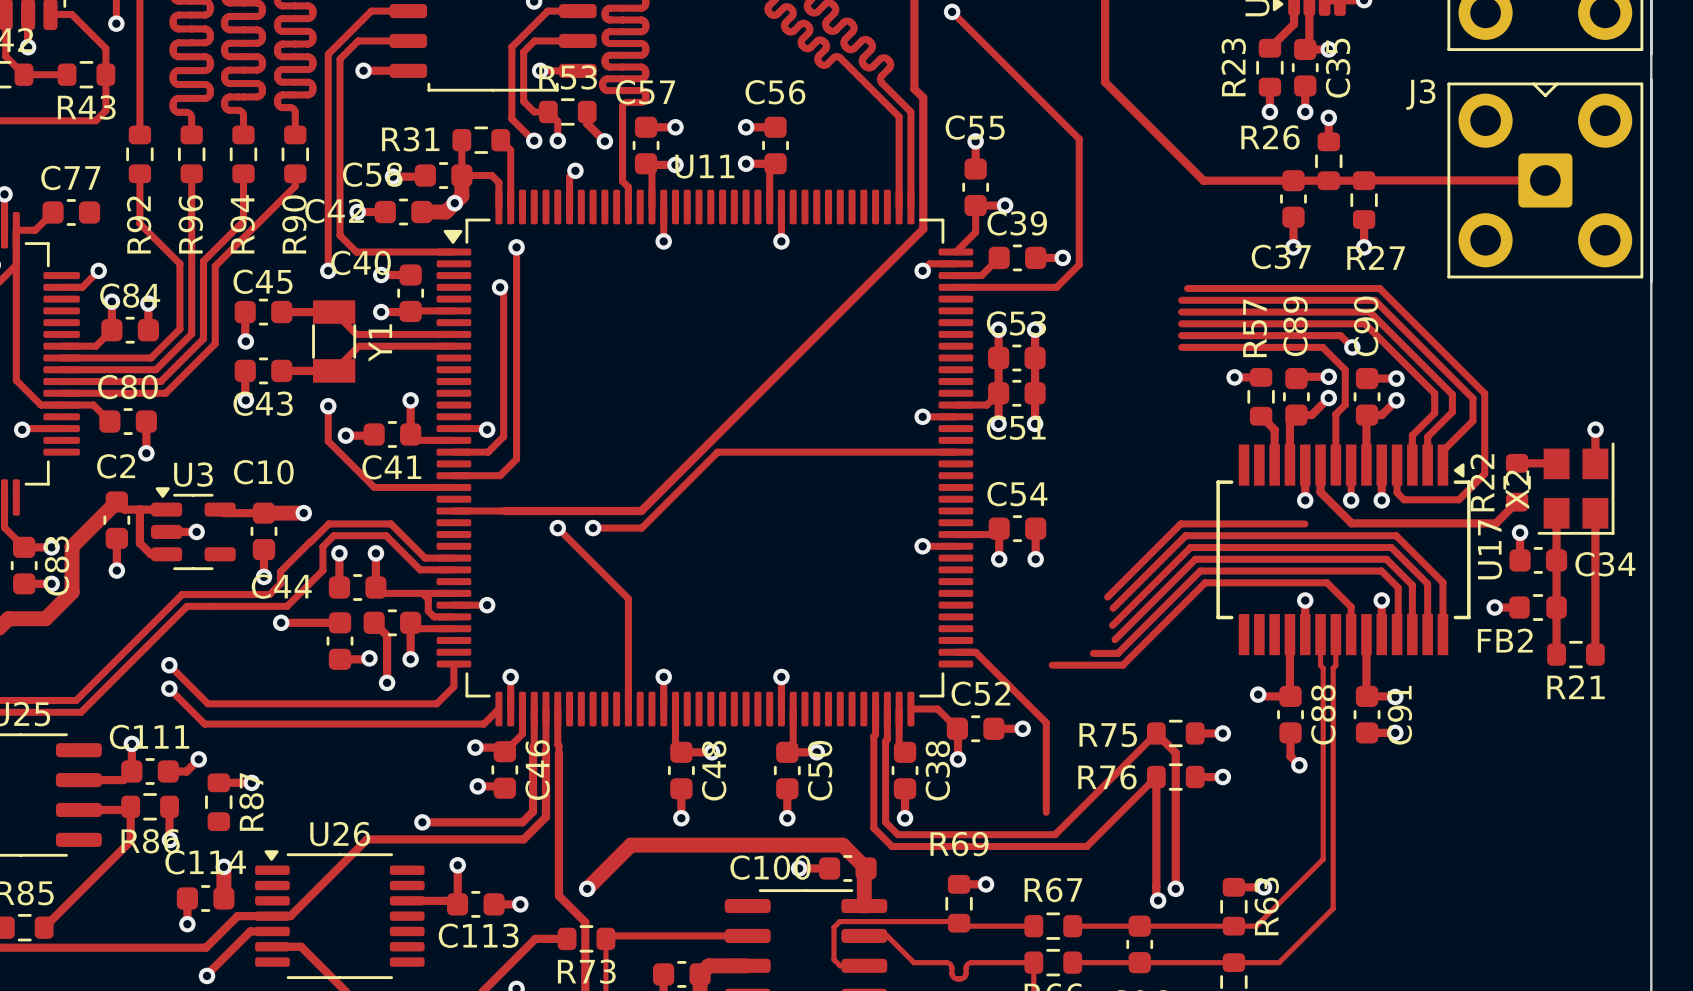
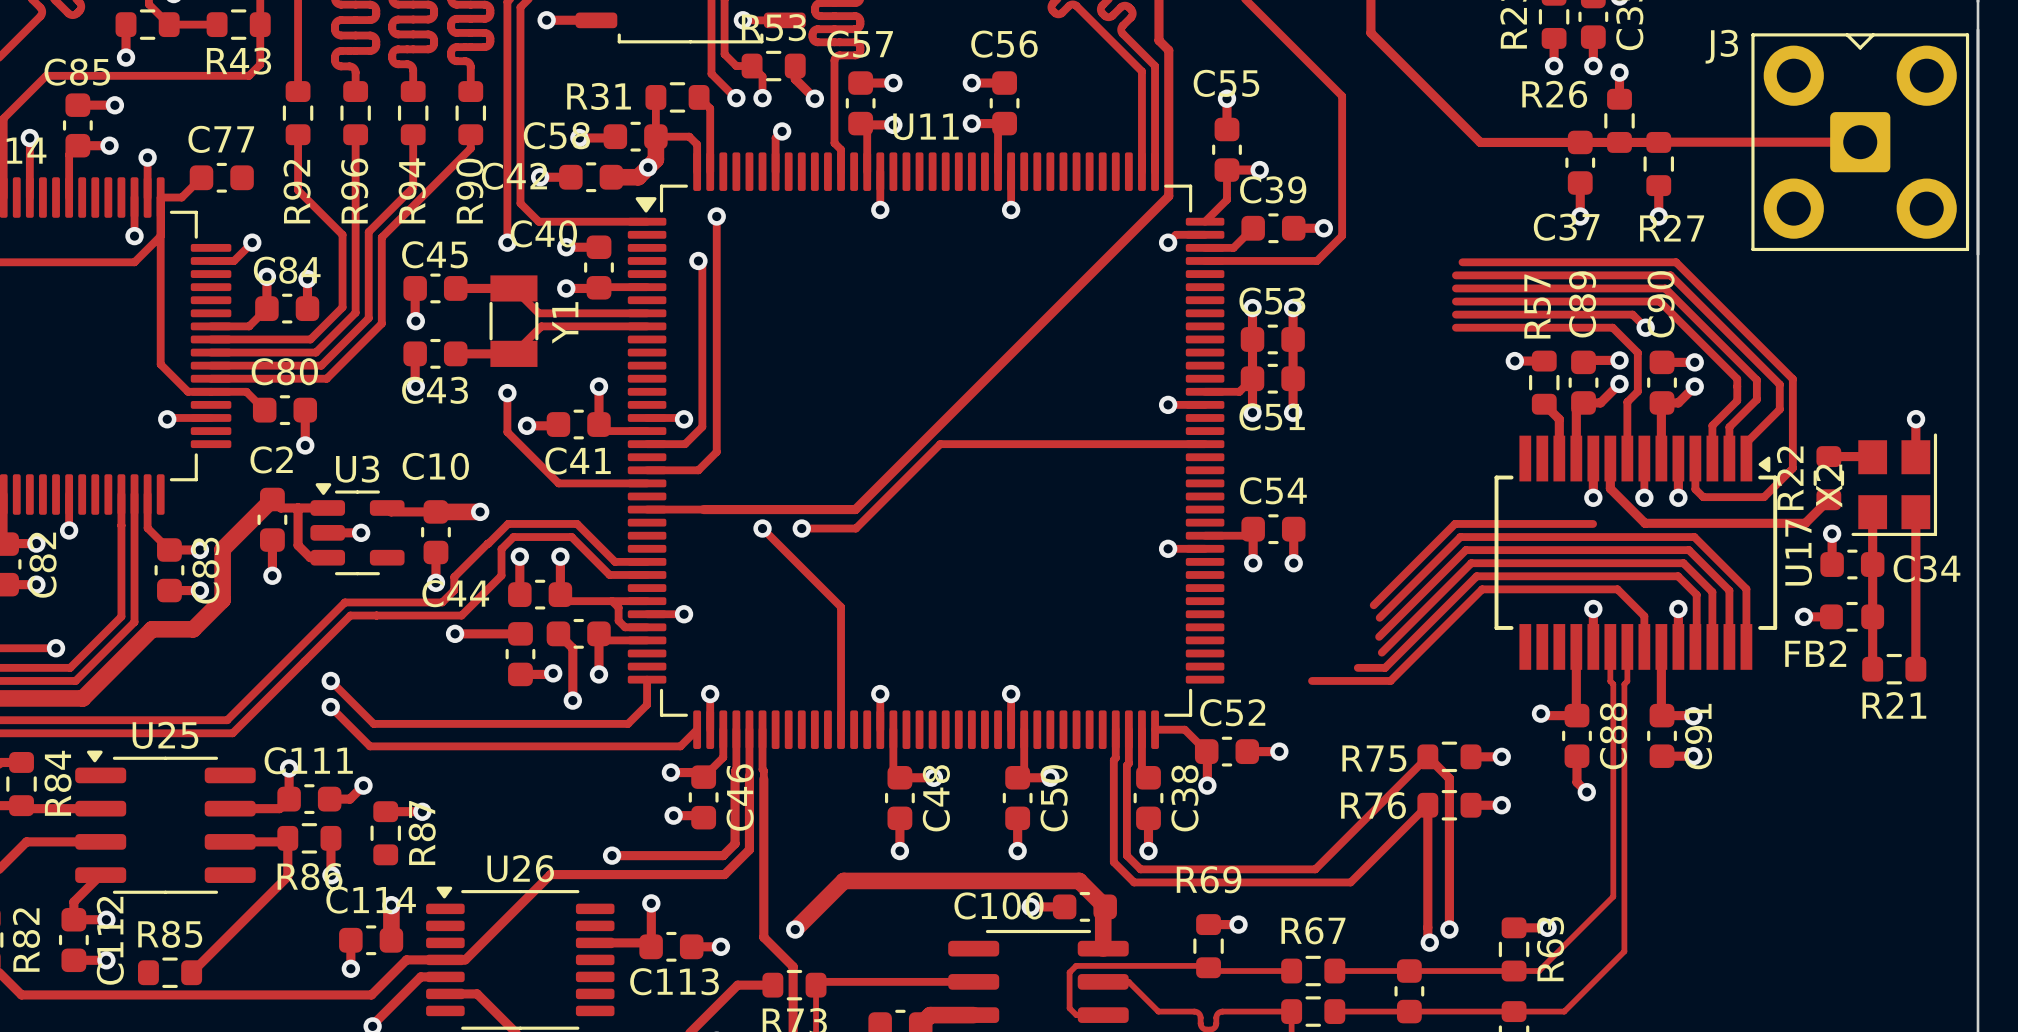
track: (955, 652) (975, 652) (1046, 722) (1046, 812) -> none

